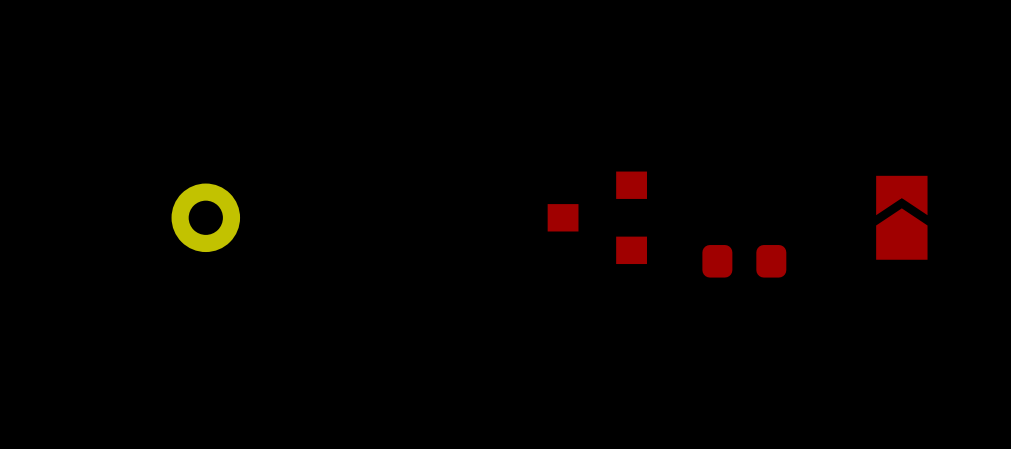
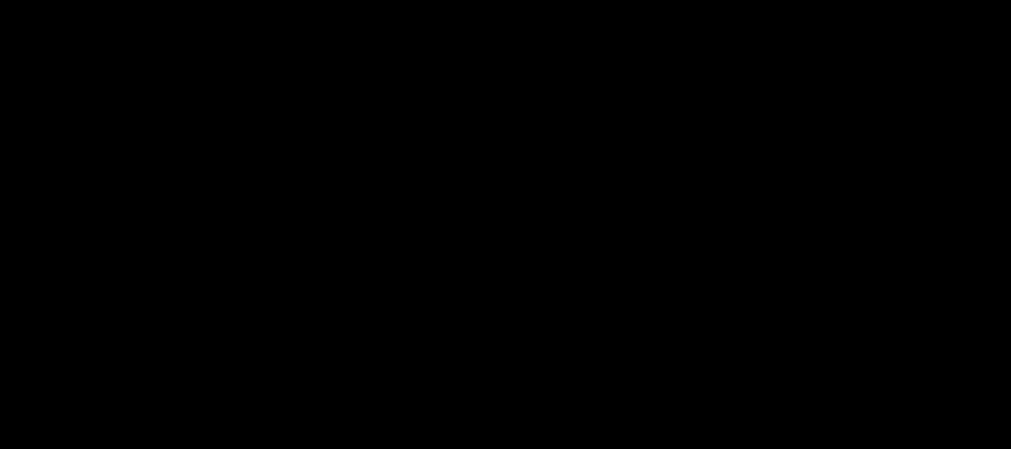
part: (205, 217) -> none
part: (597, 217) -> none
part: (901, 217) -> none
part: (744, 261) -> none

